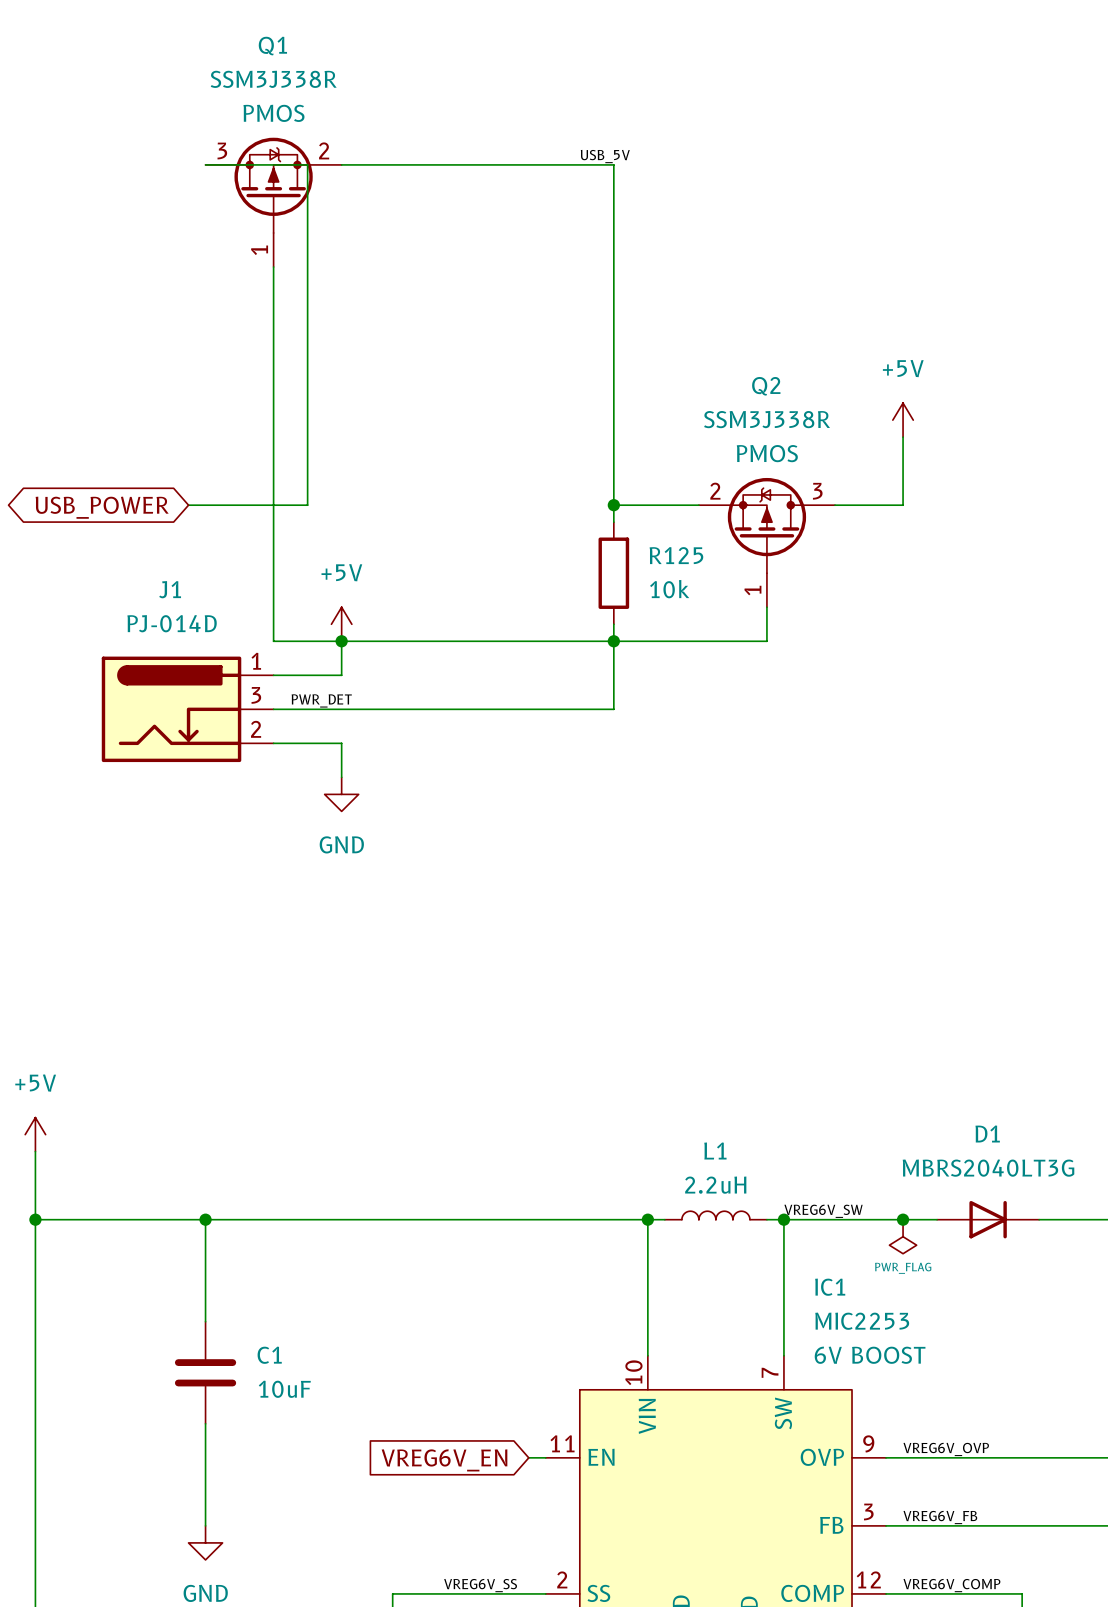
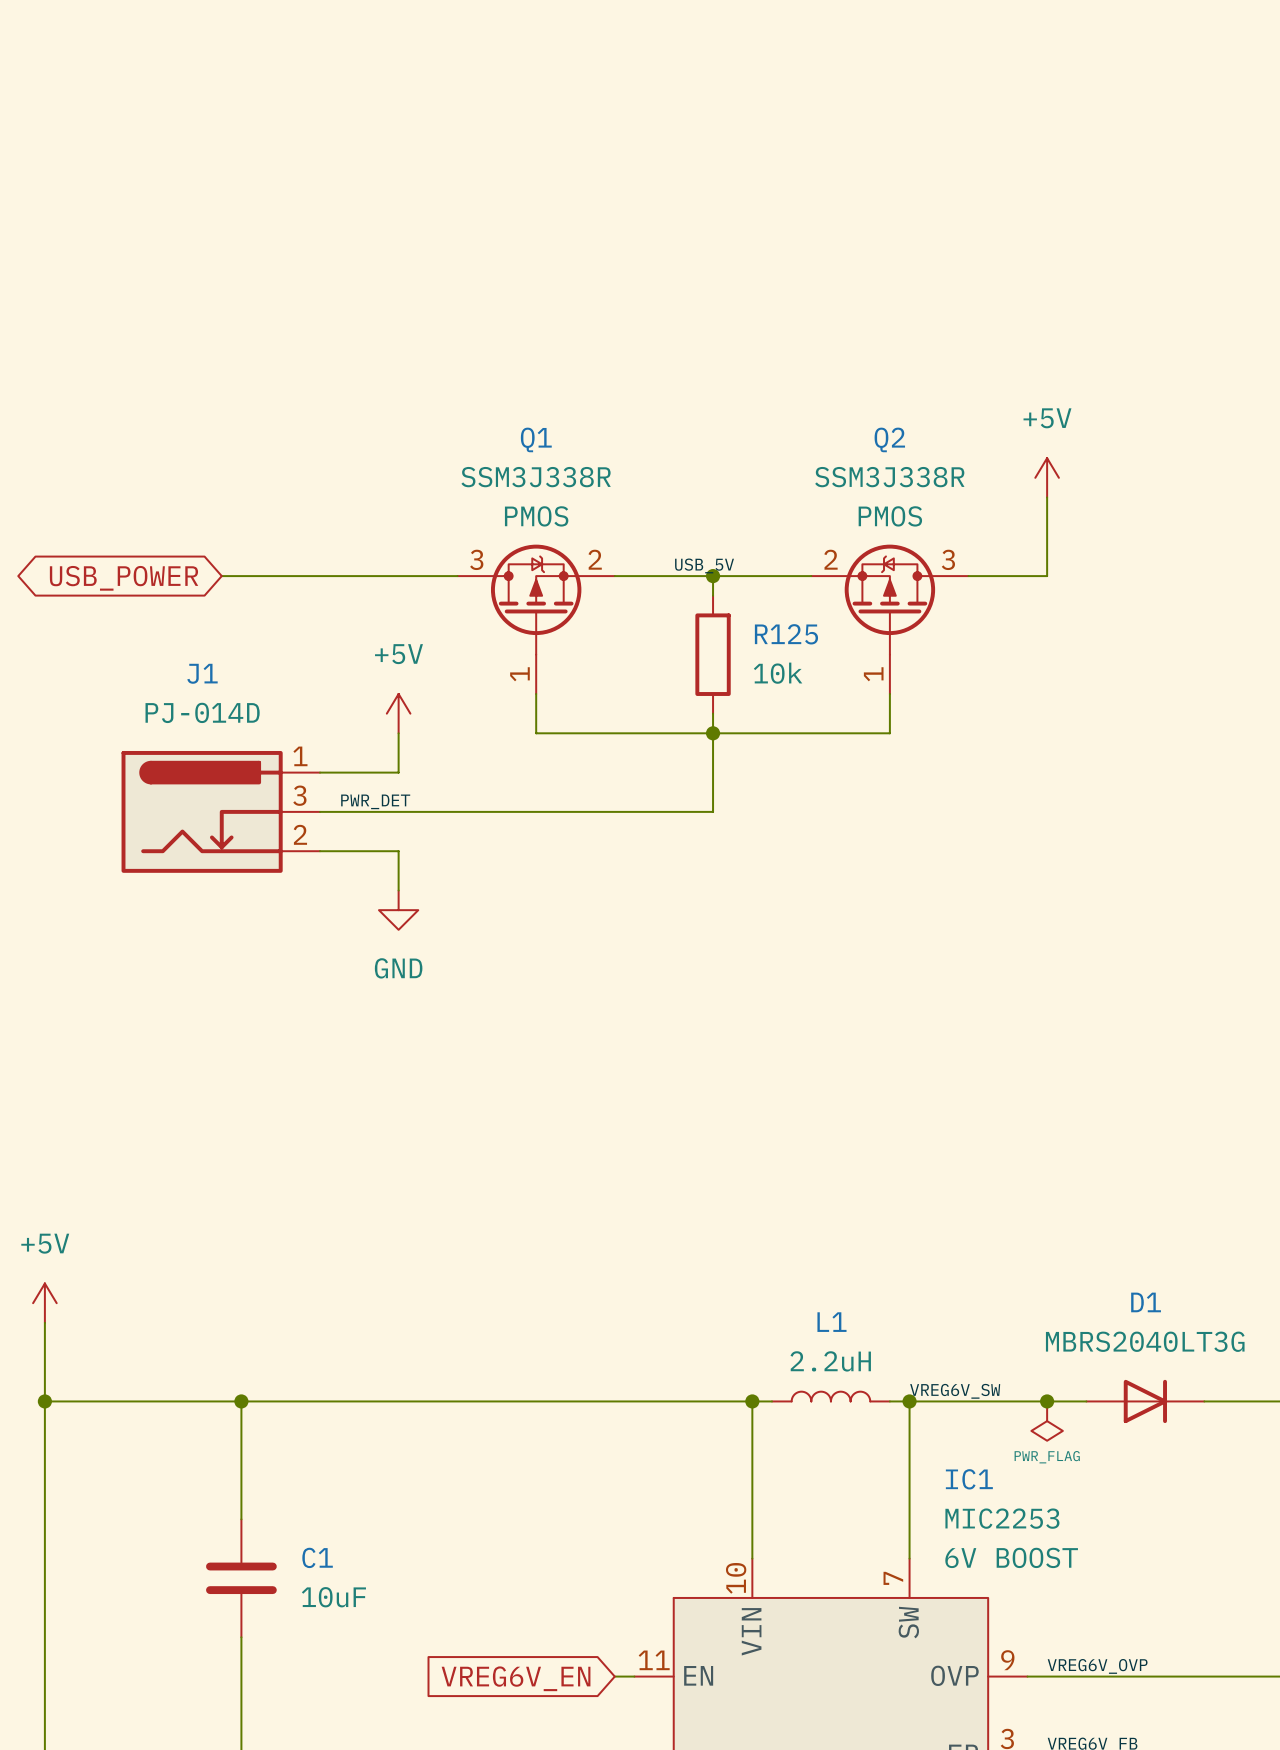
label: USB_5V (605, 156) -> none
wire: (205, 164) (307, 164) (307, 505) -> (457, 576) (359, 576)
wire: (341, 164) (613, 164) (613, 505) -> (614, 576) (713, 576)
Q1 position: (273, 202) -> (536, 619)
wire: (273, 267) (273, 641) (460, 641) -> (536, 693) (536, 733)
label: none -> USB_5V (704, 565)
junction: (341, 641) -> none

